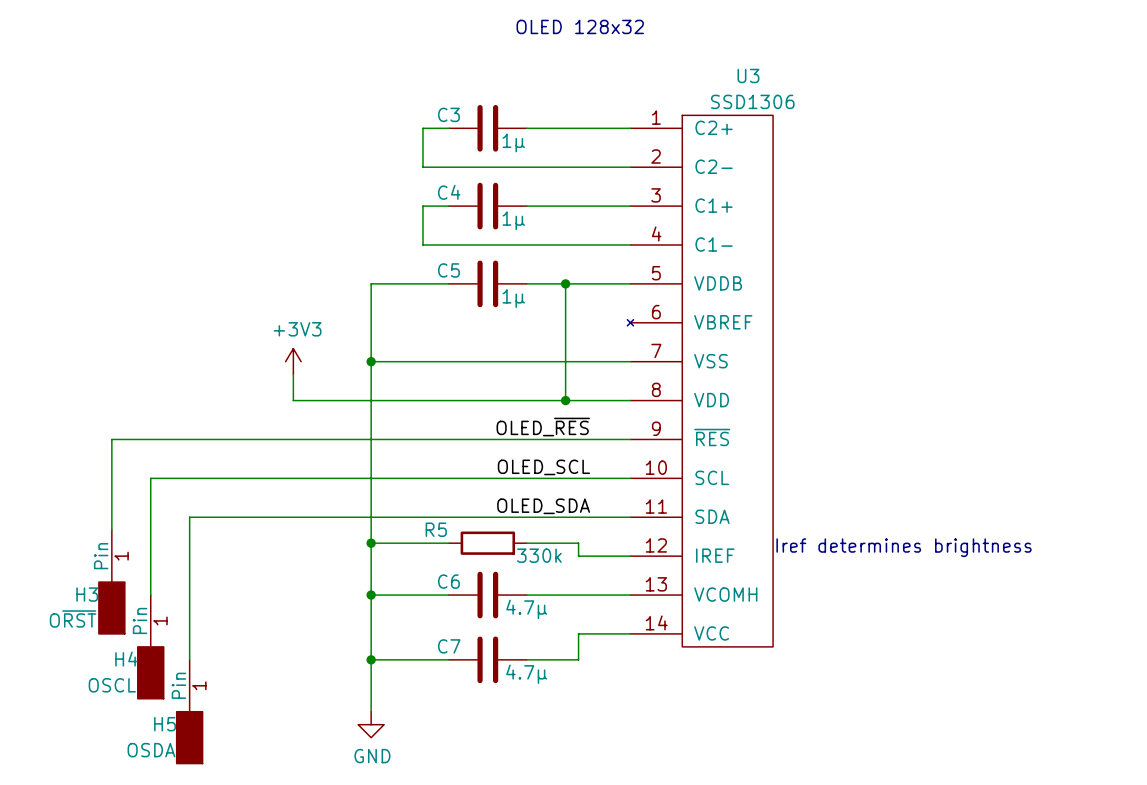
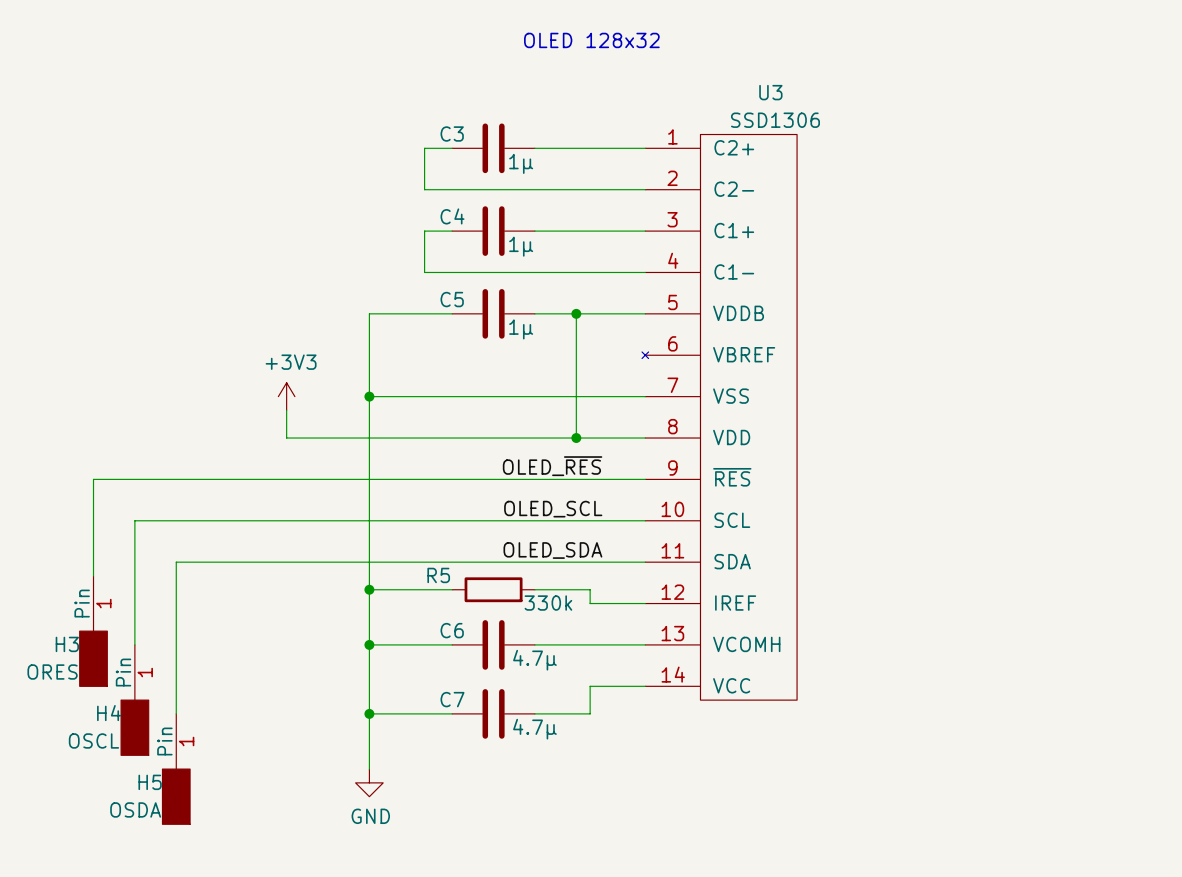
text: Iref determines brightness (904, 547) -> none
H3 value: O~{RST} (73, 618) -> ORES (52, 672)

